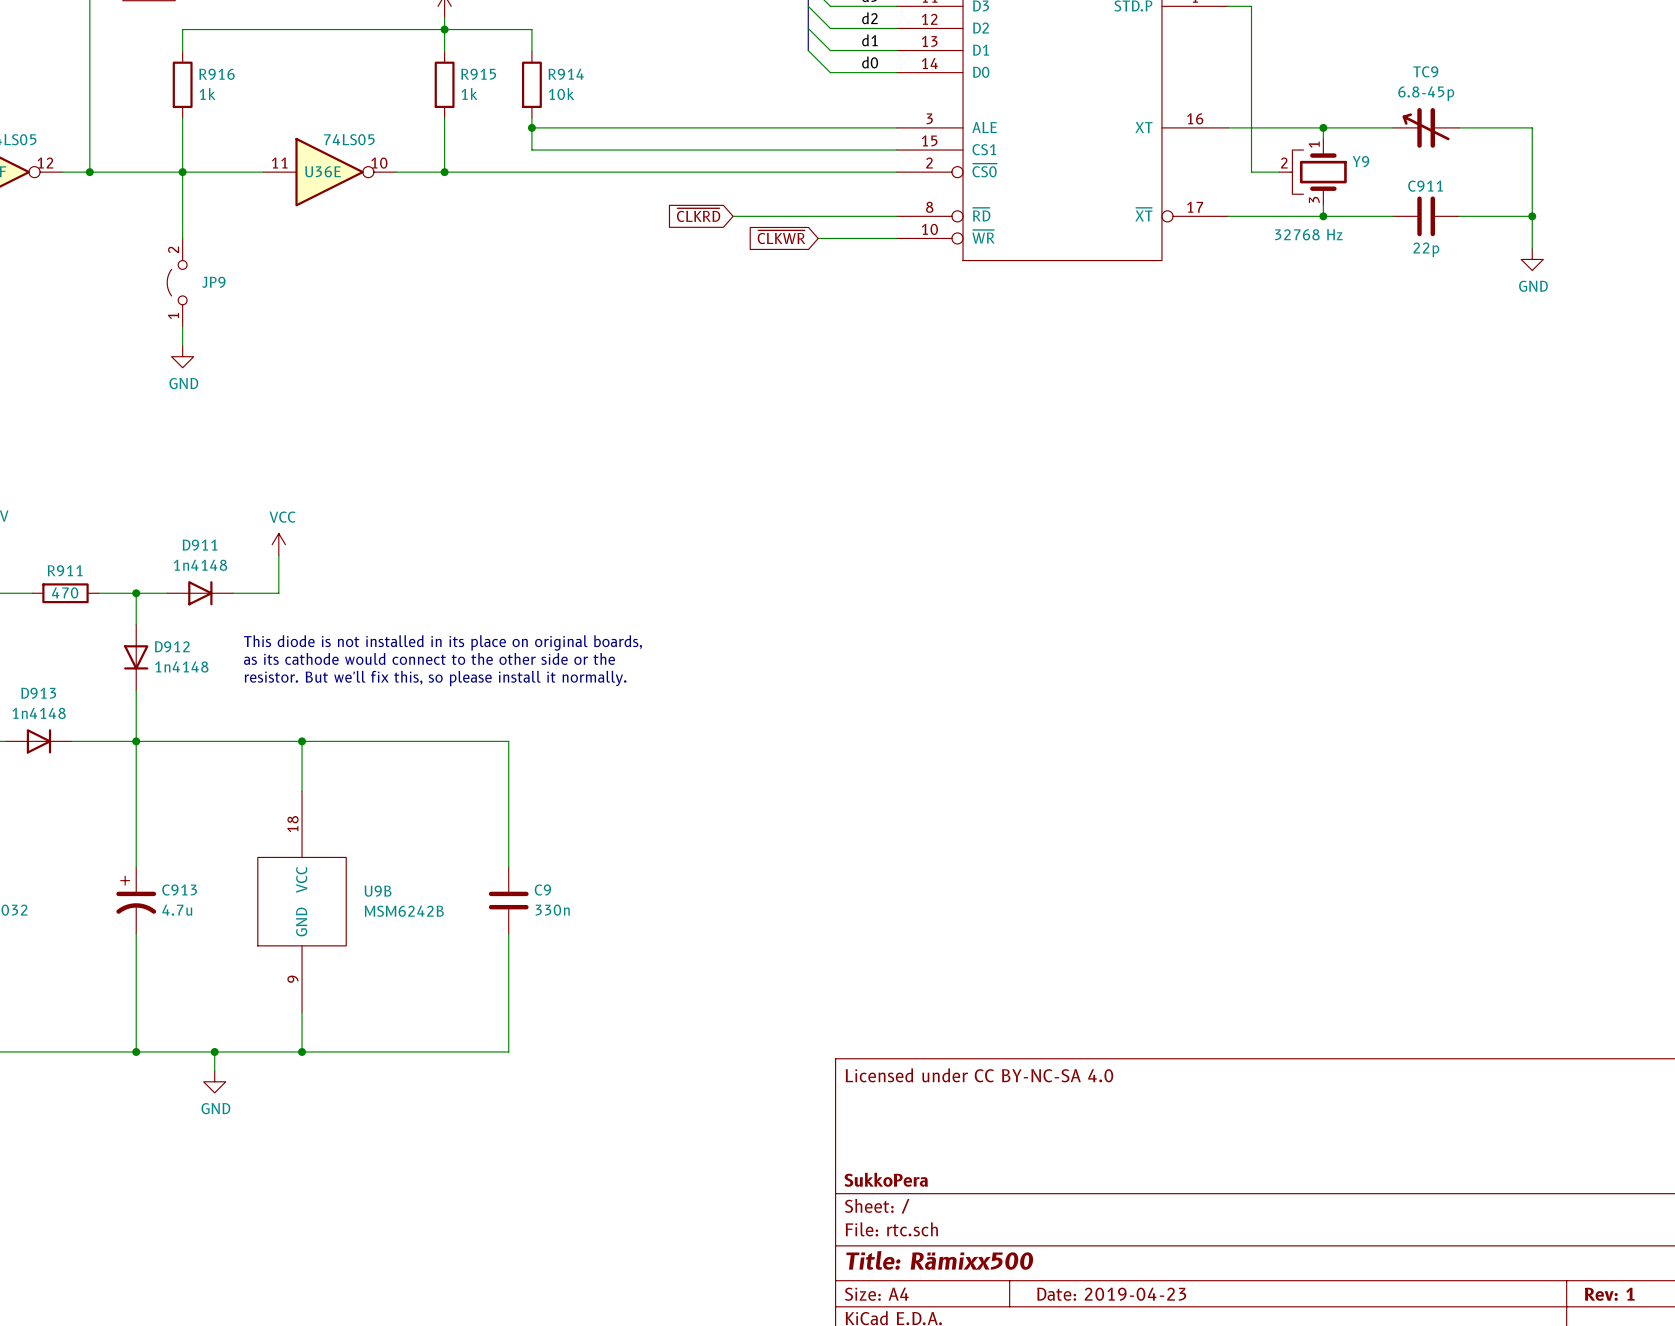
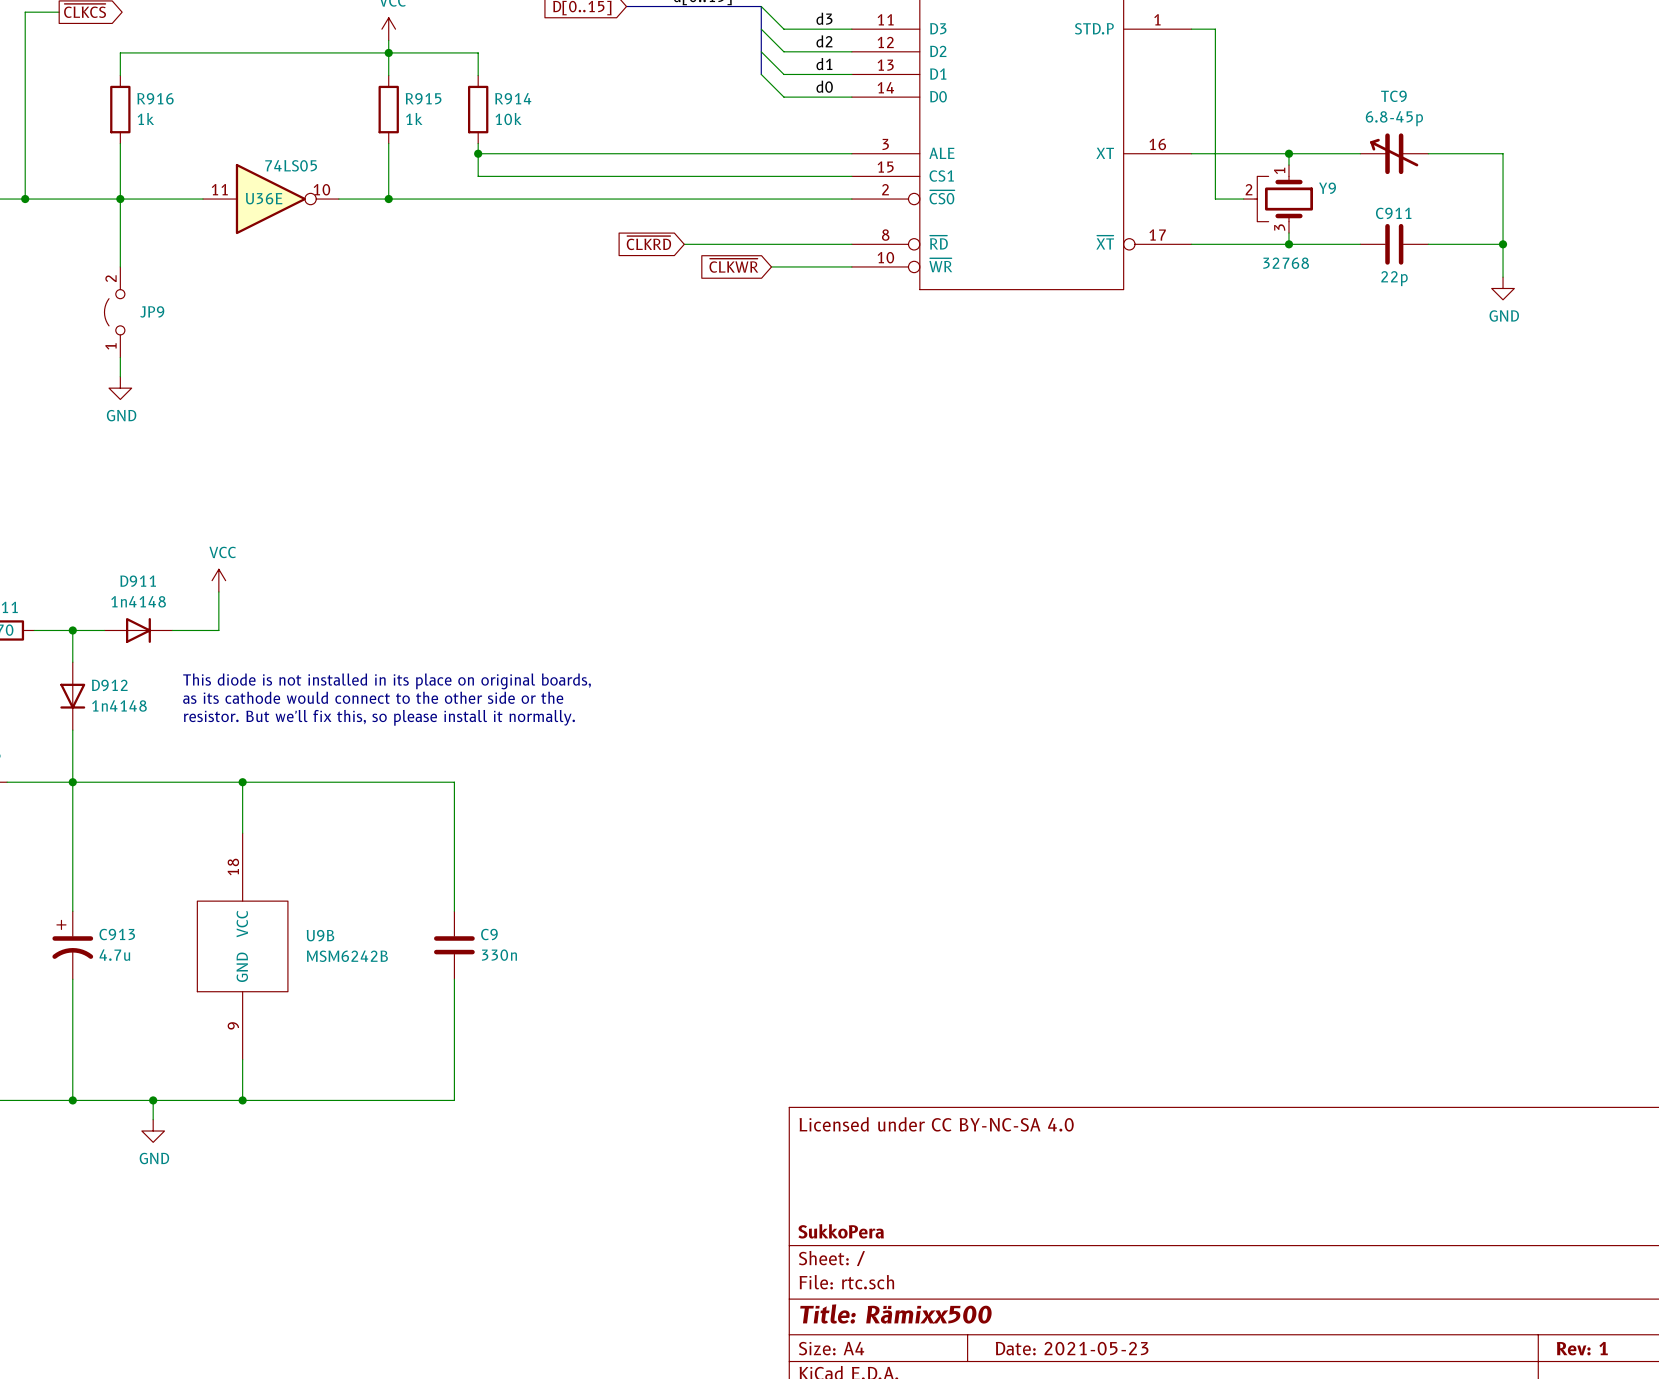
Y9 value: 32768 Hz (1308, 234) -> 32768 (1286, 263)
title block: Date: 2019-04-23 (1111, 1294) -> Date: 2021-05-23 (1072, 1348)

